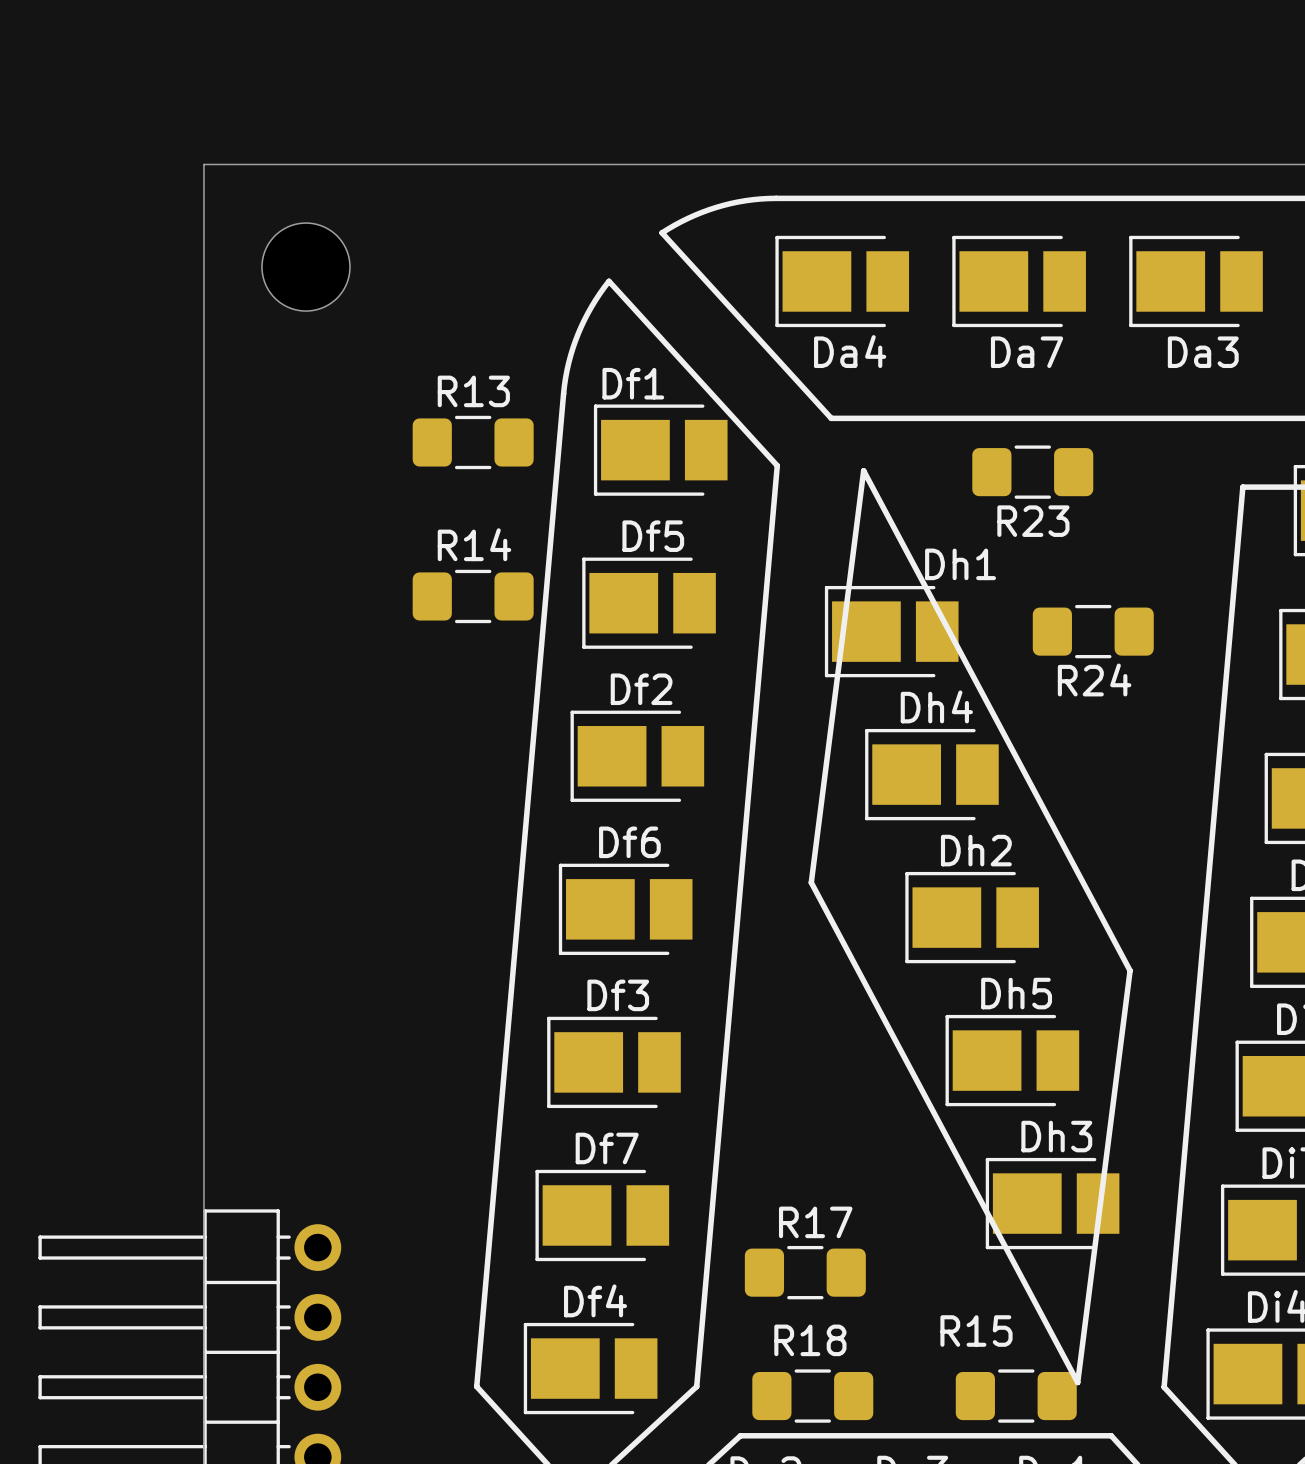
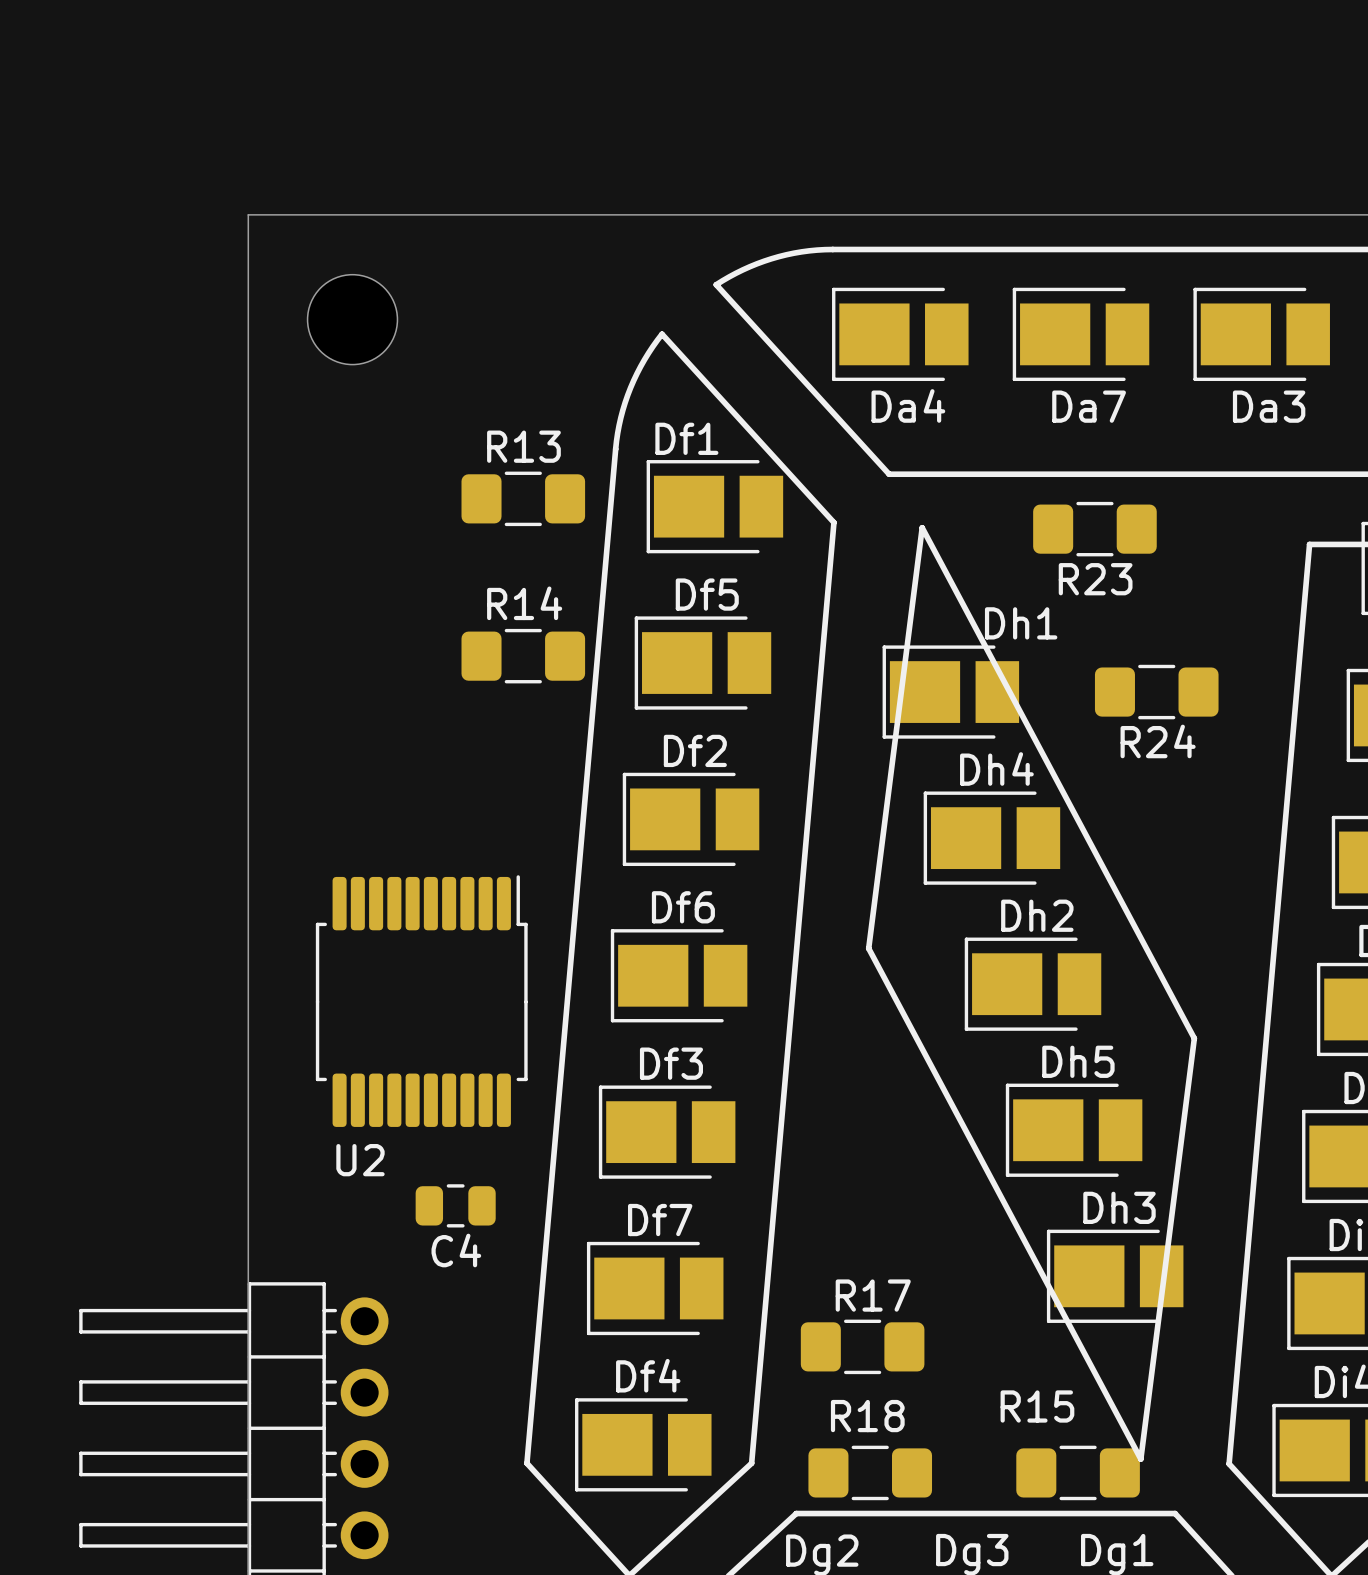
U2: none -> (421, 1001)
C4: none -> (455, 1205)

